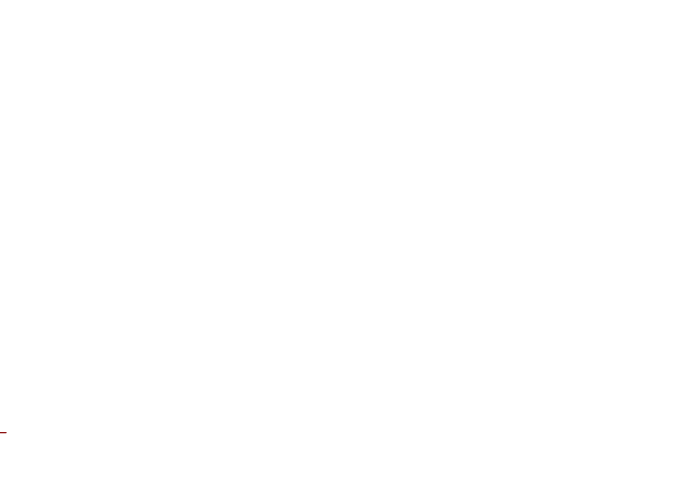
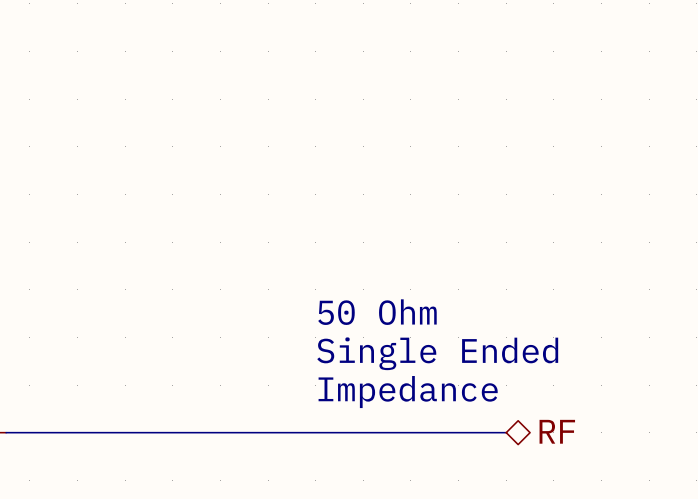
text: none -> 50 Ohm (377, 312)
text: none -> Single Ended (437, 353)
text: none -> Impedance (408, 392)
hierarchical label: none -> RF (557, 431)
wire: none -> (6, 432) (506, 432)

